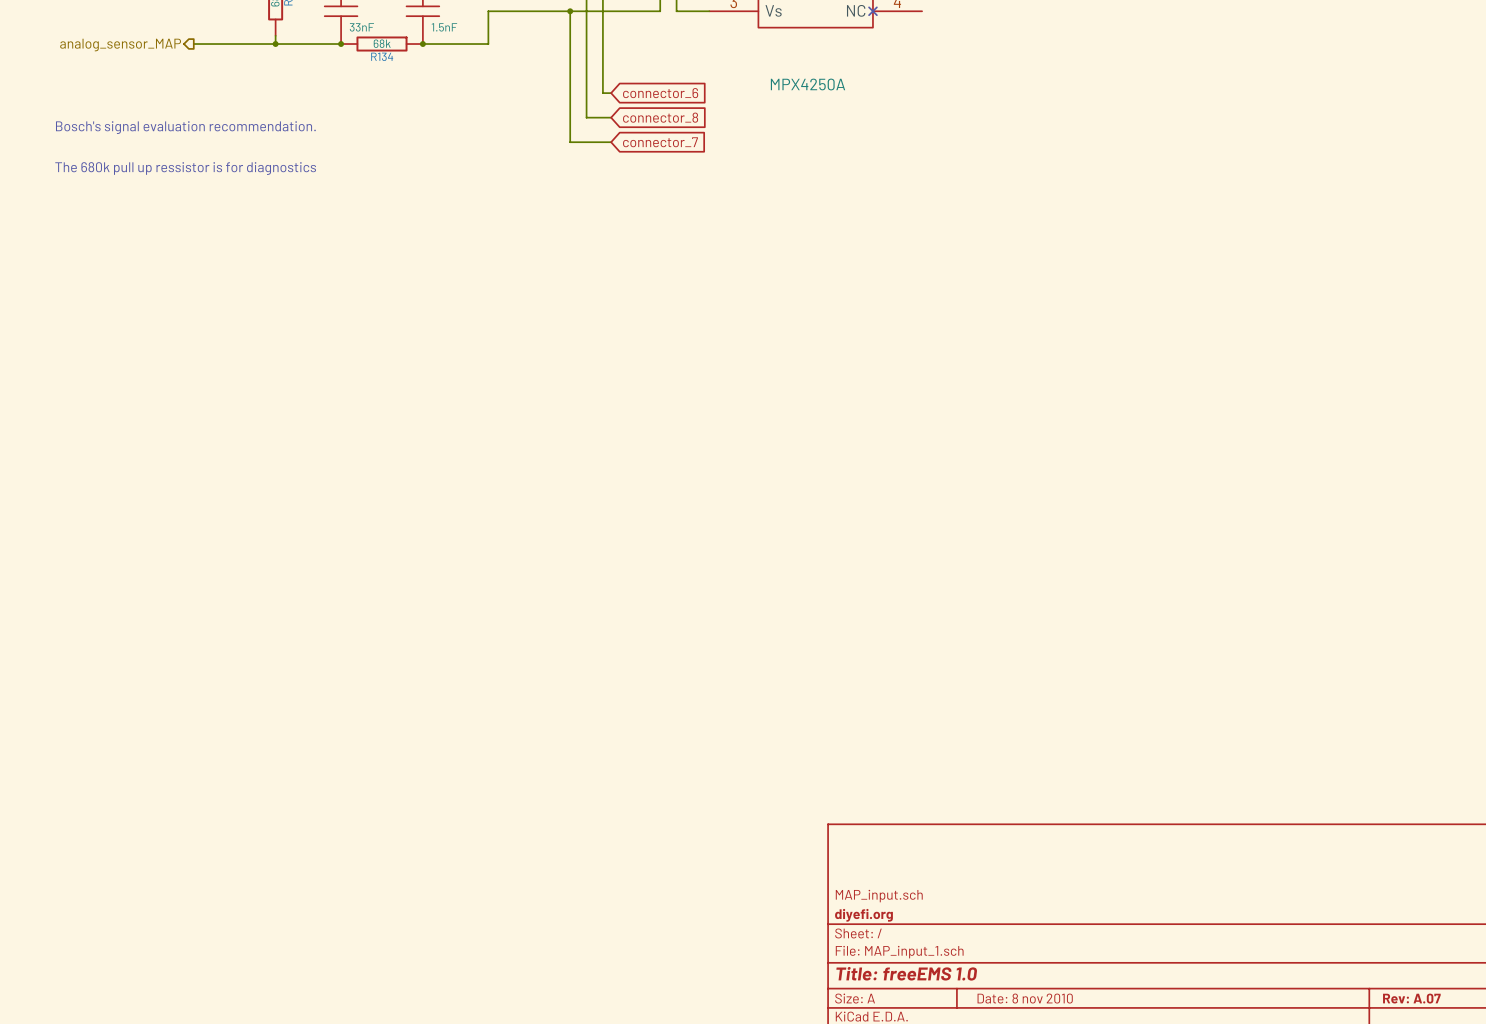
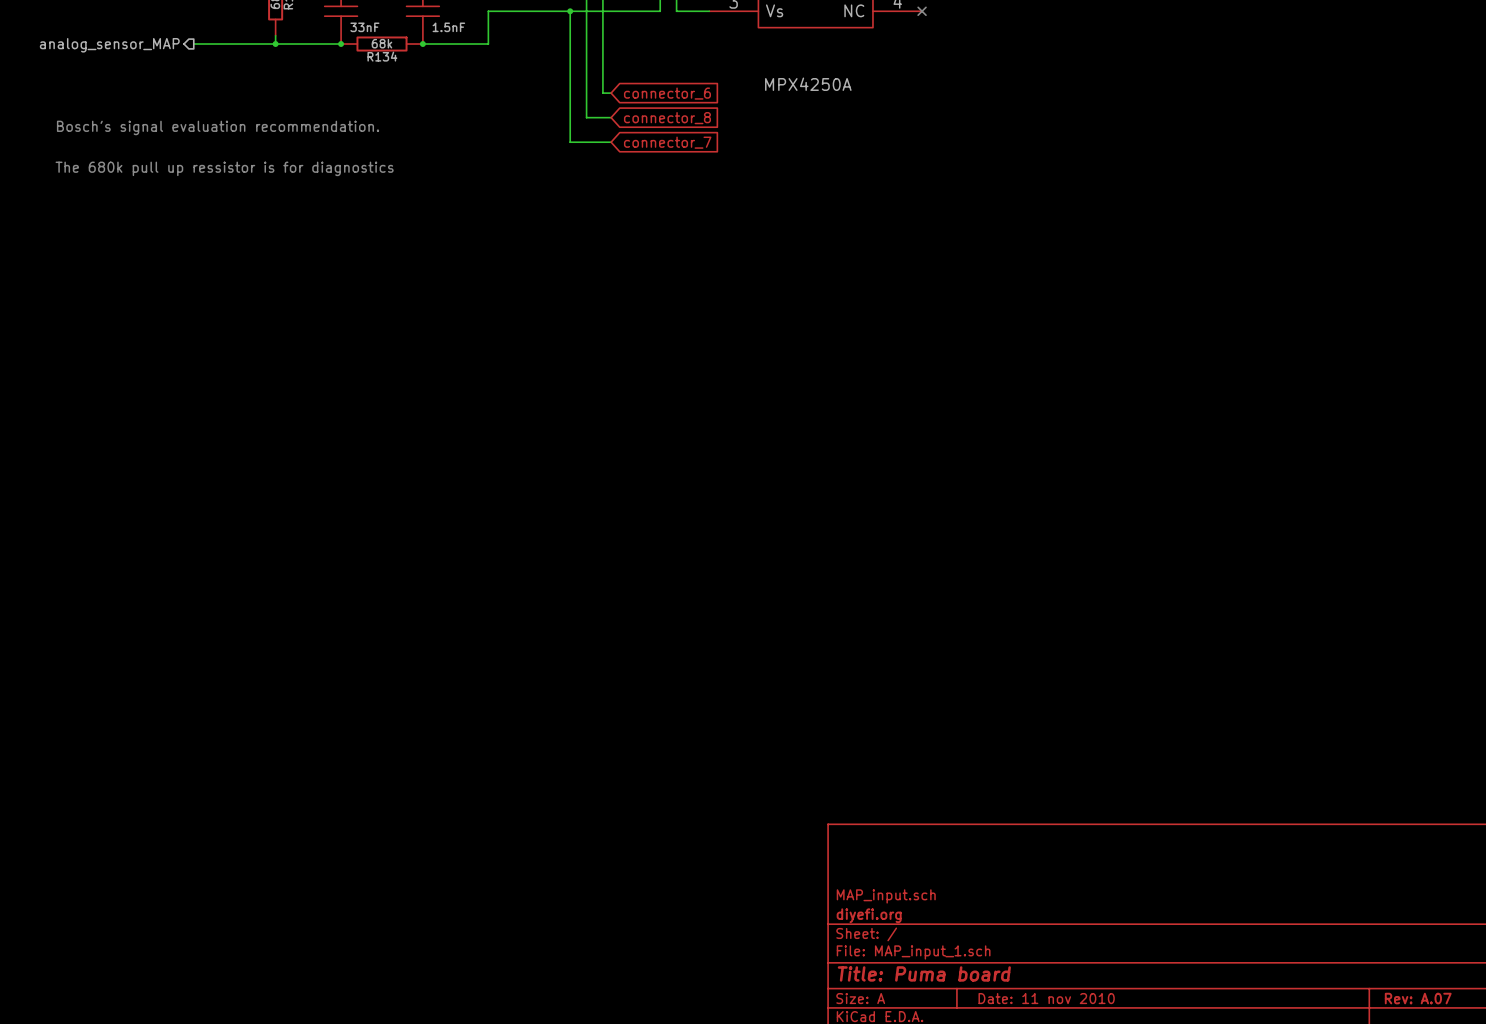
no-connect mark: (872, 11) -> none
no-connect mark: none -> (922, 11)
title block: Title: freeEMS 1.0 (906, 973) -> Title: Puma board (924, 973)
title block: Date: 8 nov 2010 (1025, 998) -> Date: 11 nov 2010 (1046, 998)

